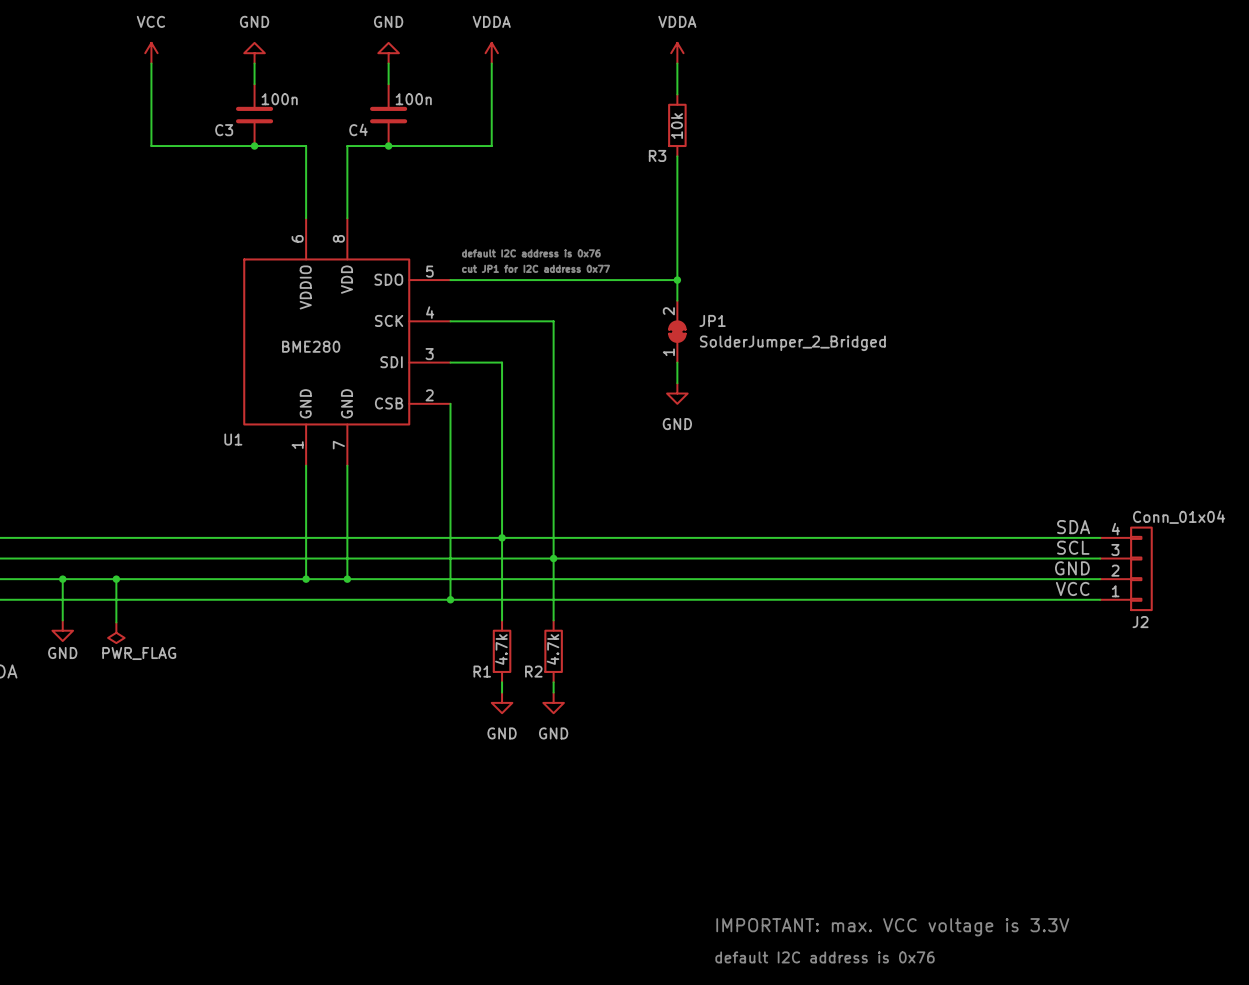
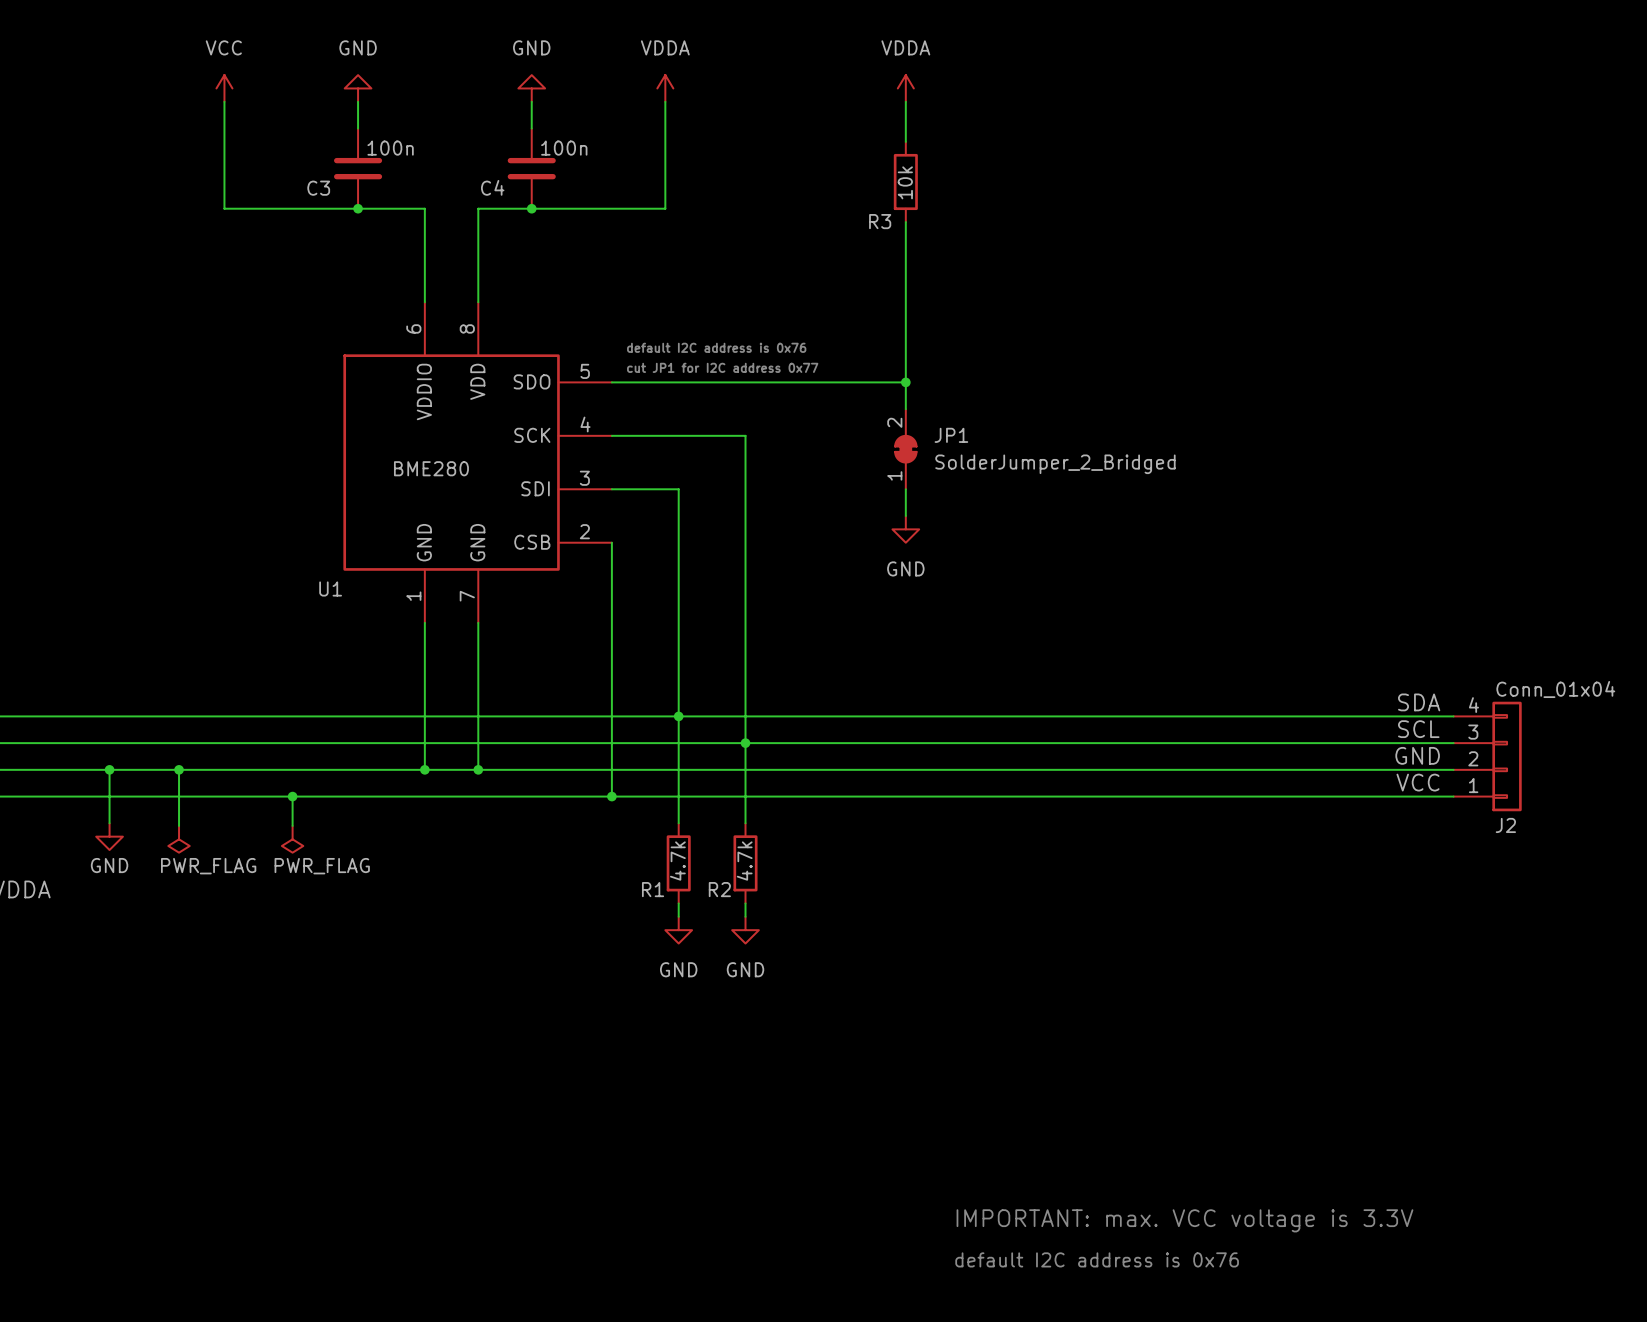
wire: none -> (292, 796) (292, 825)
junction: none -> (292, 796)
power symbol: none -> PWR_FLAG (292, 839)

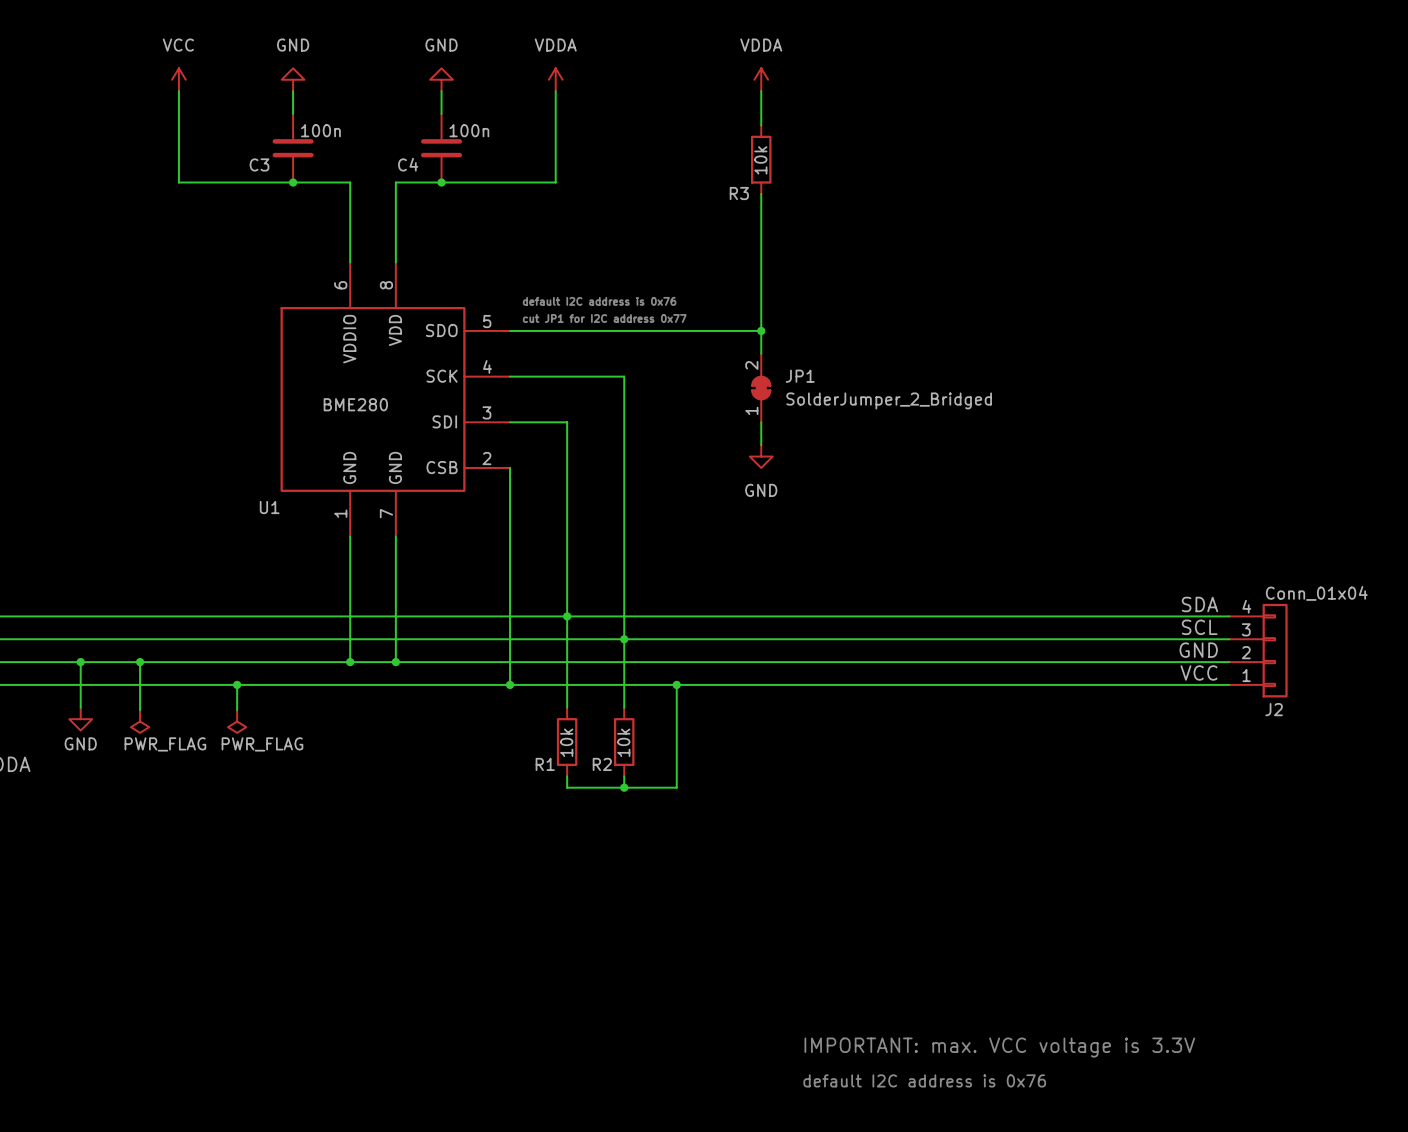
wire: none -> (676, 684) (676, 787) (567, 787)
junction: none -> (676, 684)
R1 value: 4.7k (677, 861) -> 10k (566, 742)
R2 value: 4.7k (744, 861) -> 10k (623, 742)
junction: none -> (624, 787)
power symbol: GND (678, 930) -> none
power symbol: GND (745, 930) -> none

